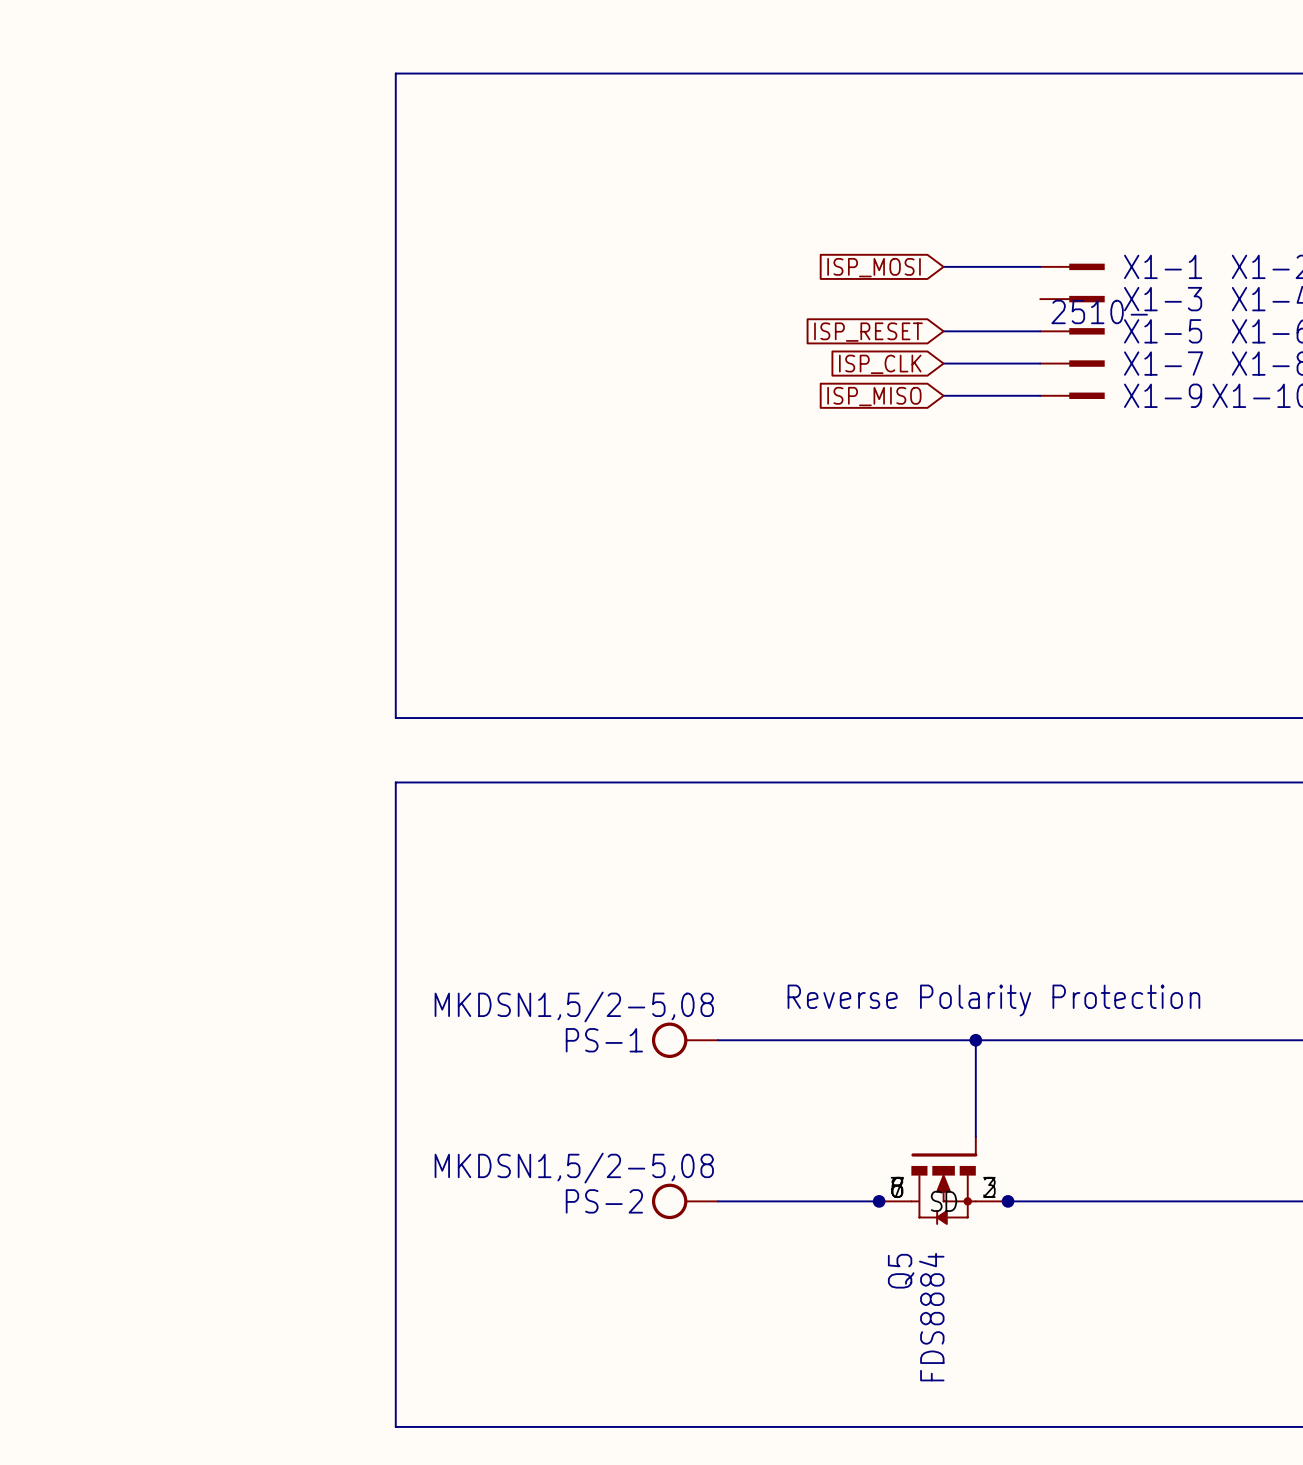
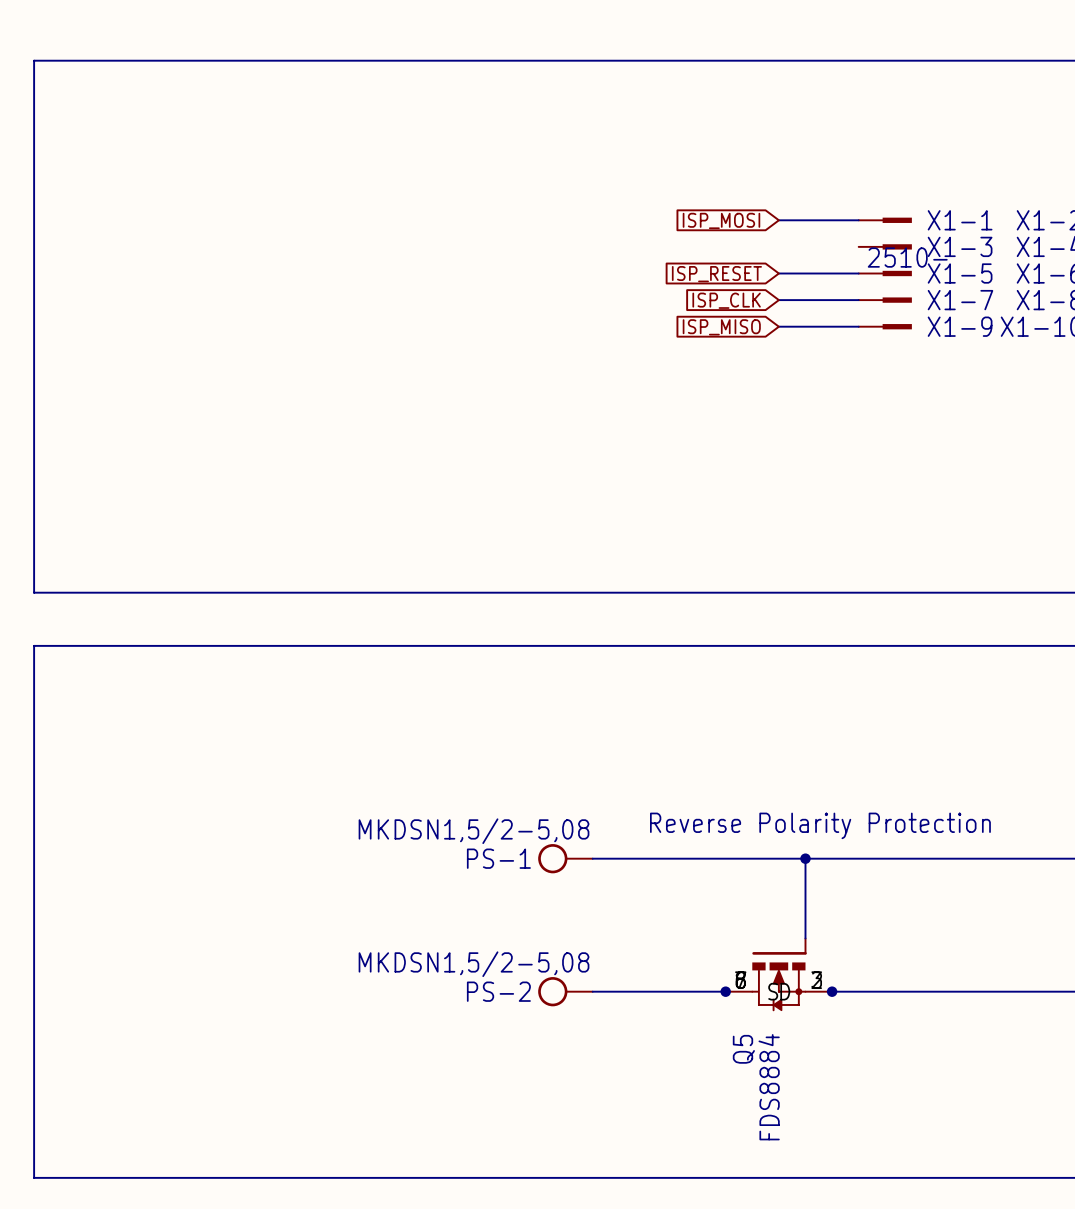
line: (395, 73) (395, 718) -> (326, 60) (34, 60) (34, 592) (326, 592)
line: (395, 782) (395, 1426) -> (326, 645) (34, 645) (34, 1177) (326, 1177)

